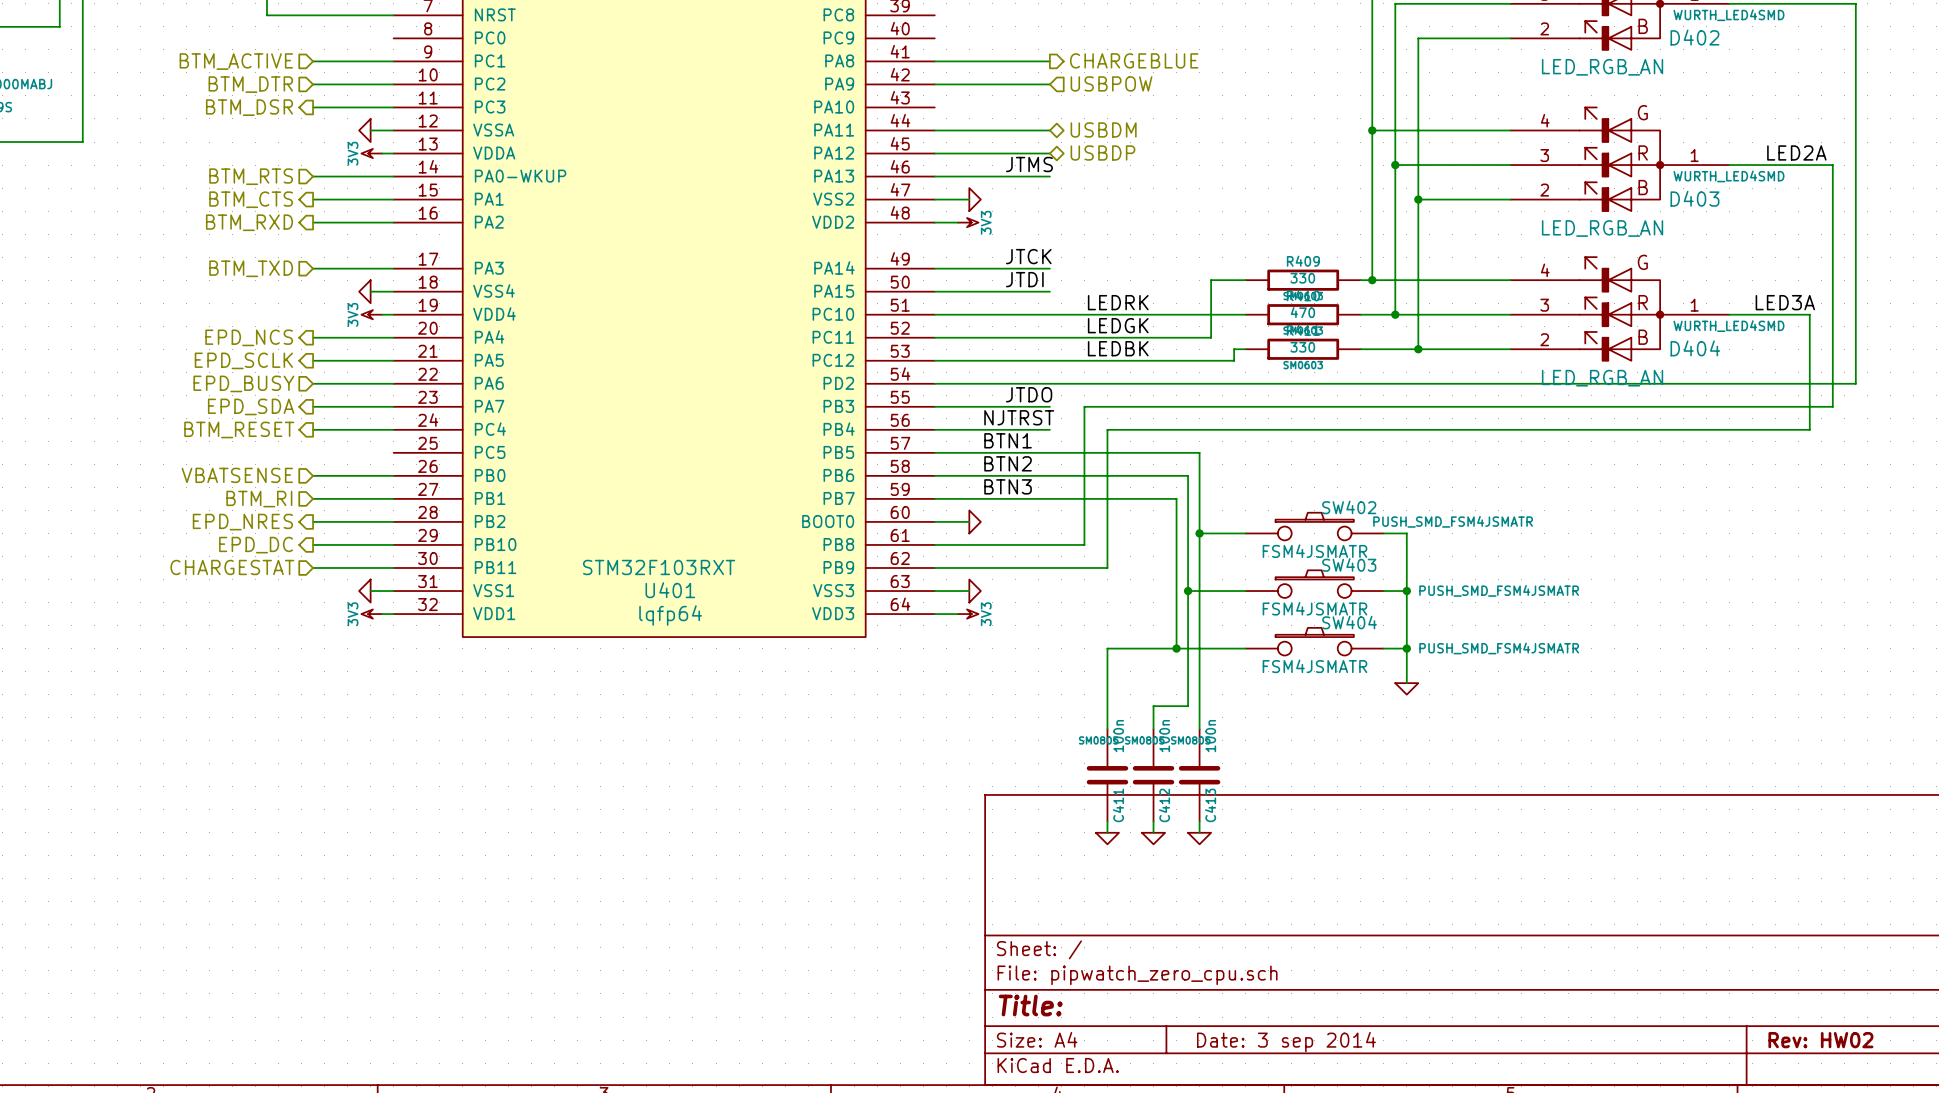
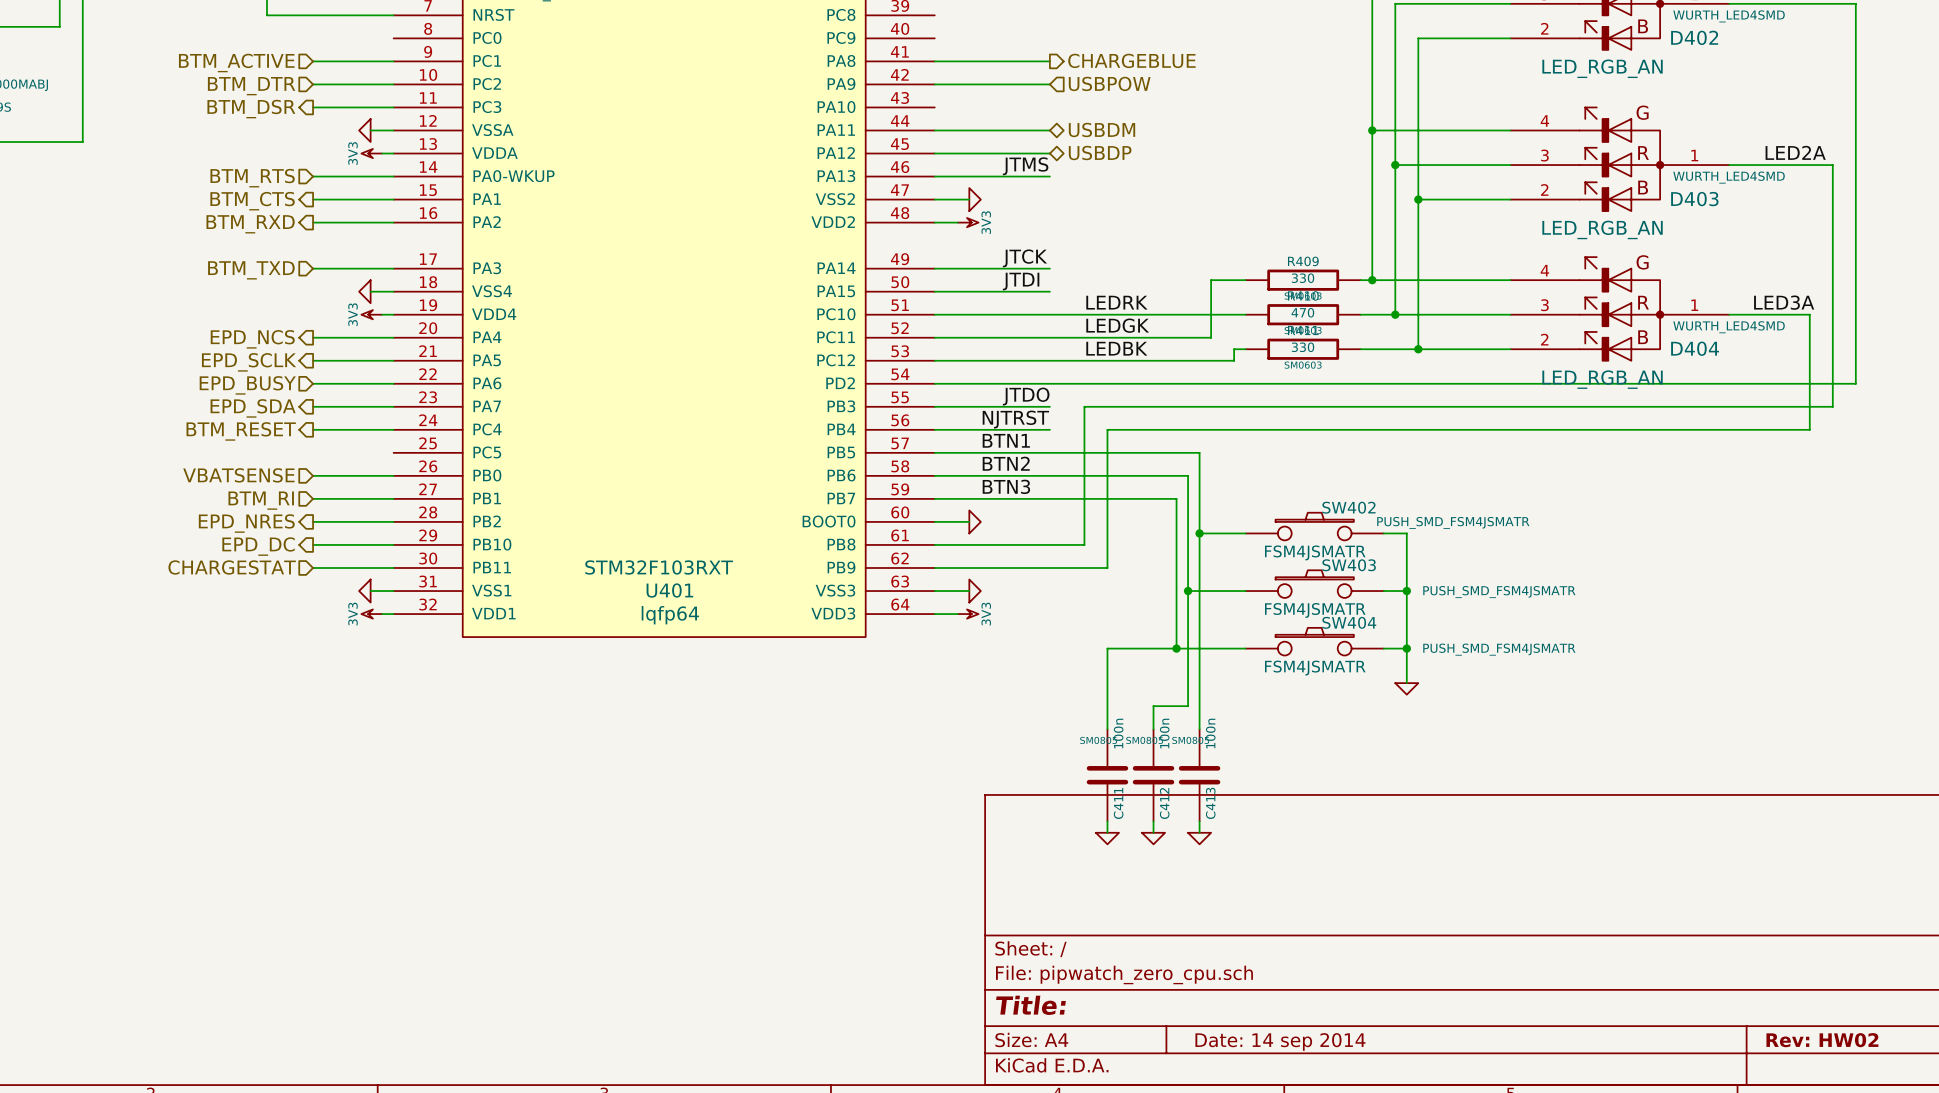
title block: Date: 3 sep 2014 (1286, 1042) -> Date: 14 sep 2014 (1280, 1041)

